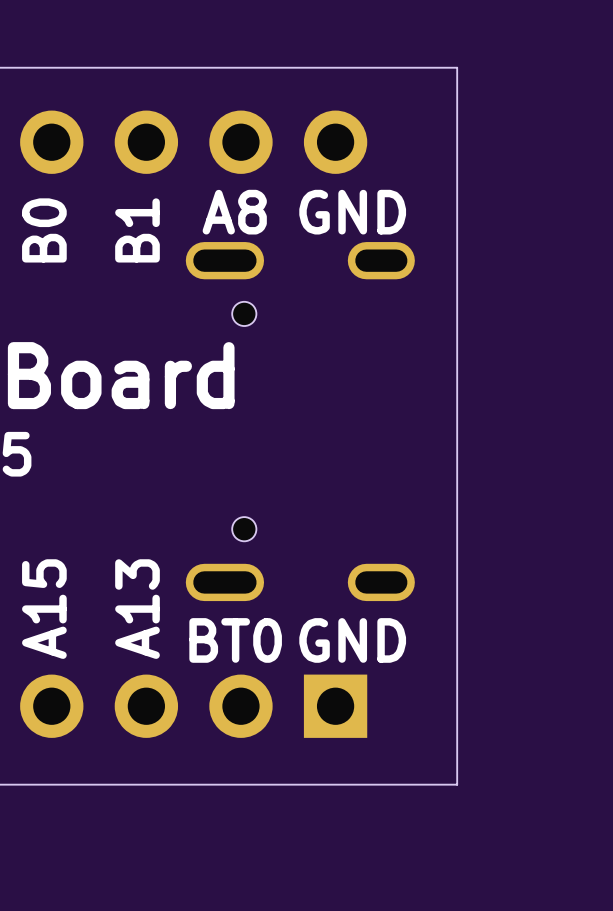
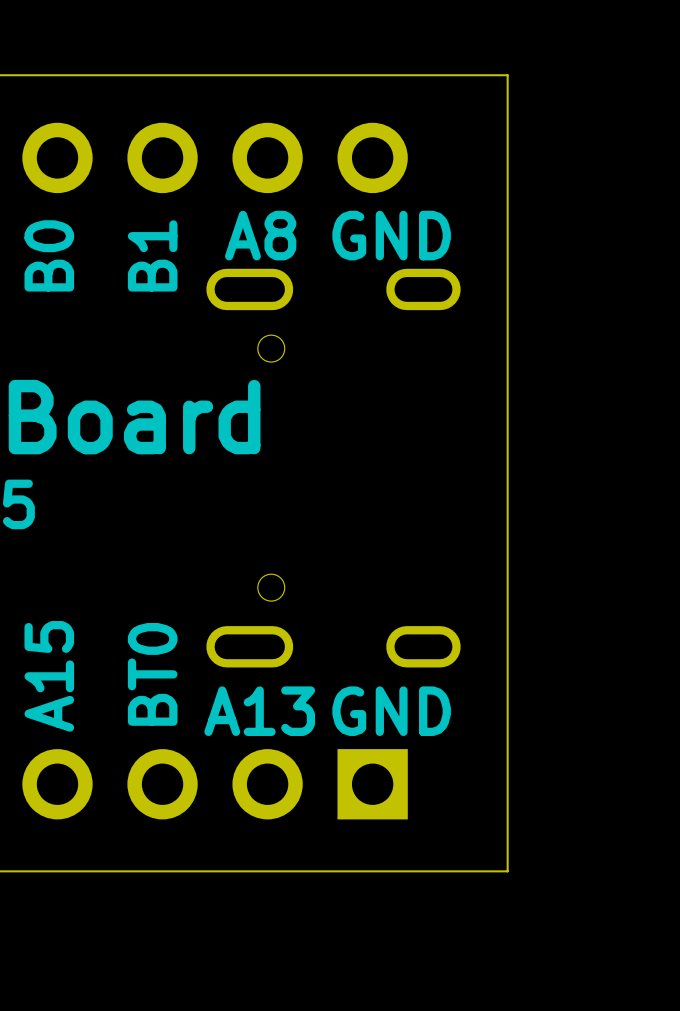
text rotation: 0° (137, 609) -> 90° clockwise (259, 711)
text rotation: 0° (235, 640) -> 90° counterclockwise (152, 674)

